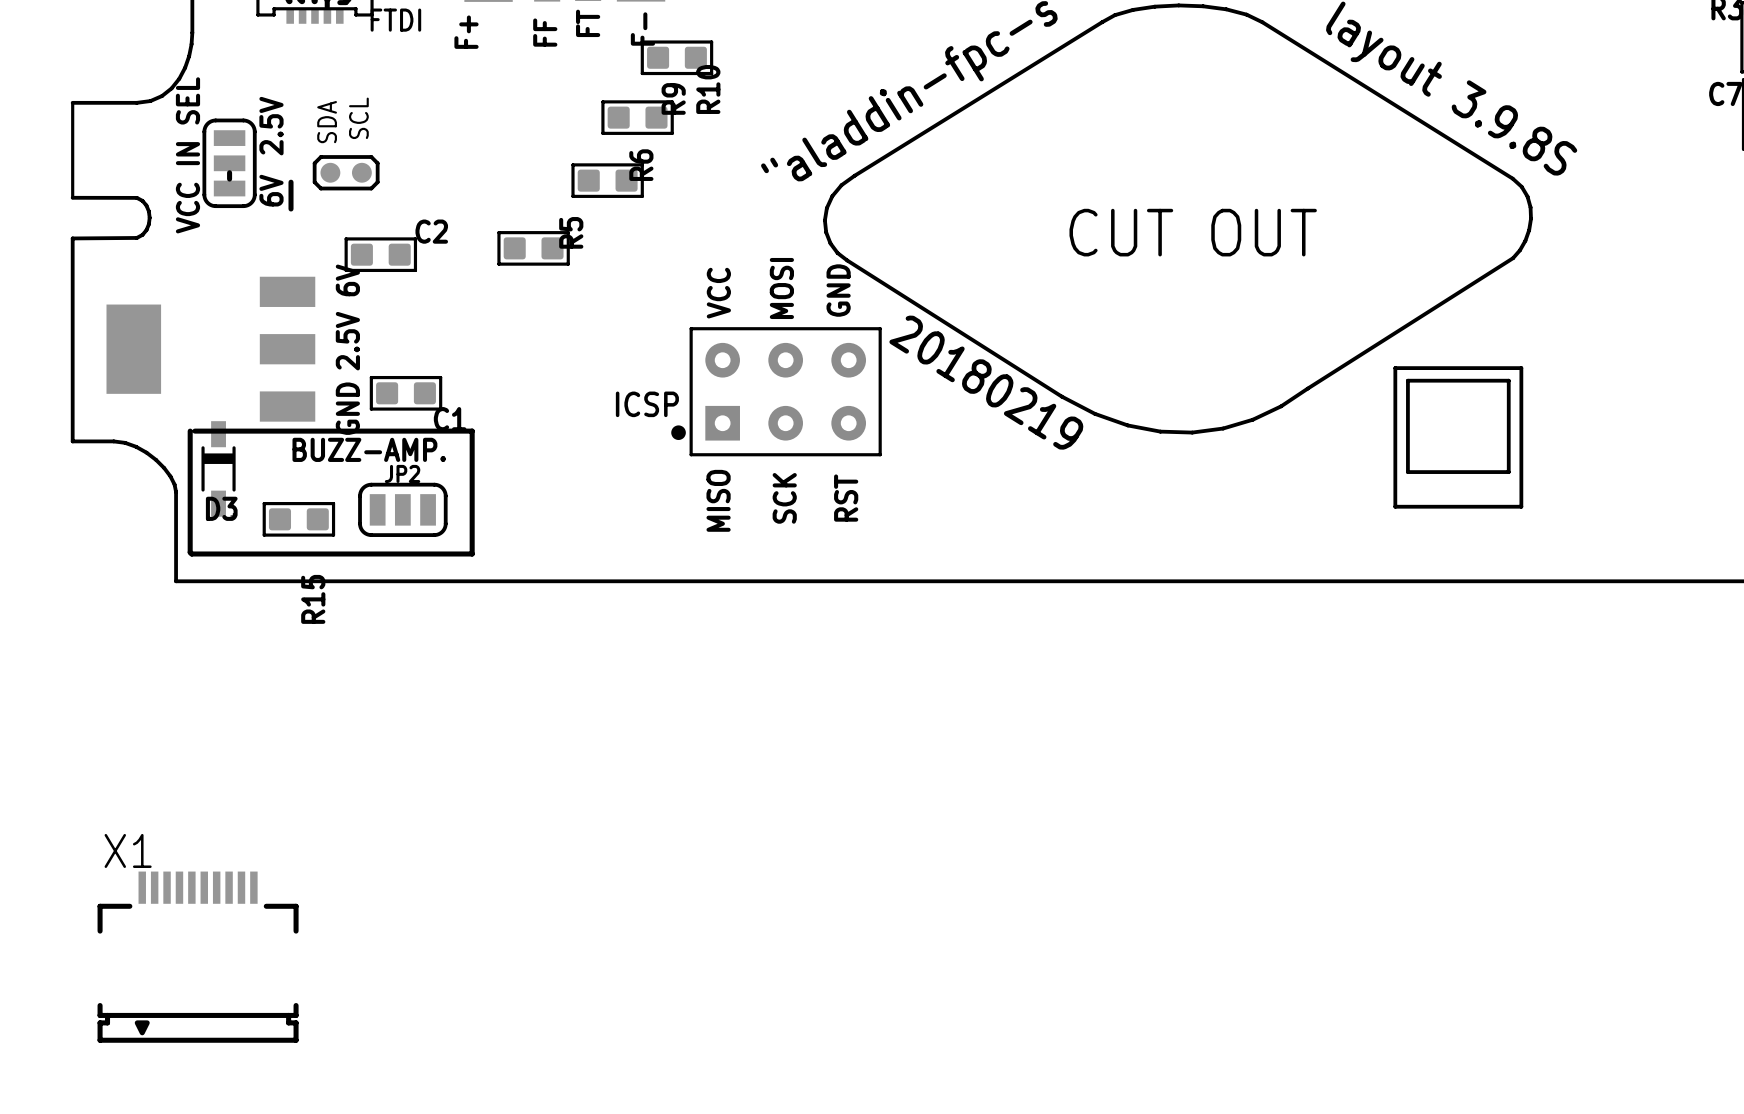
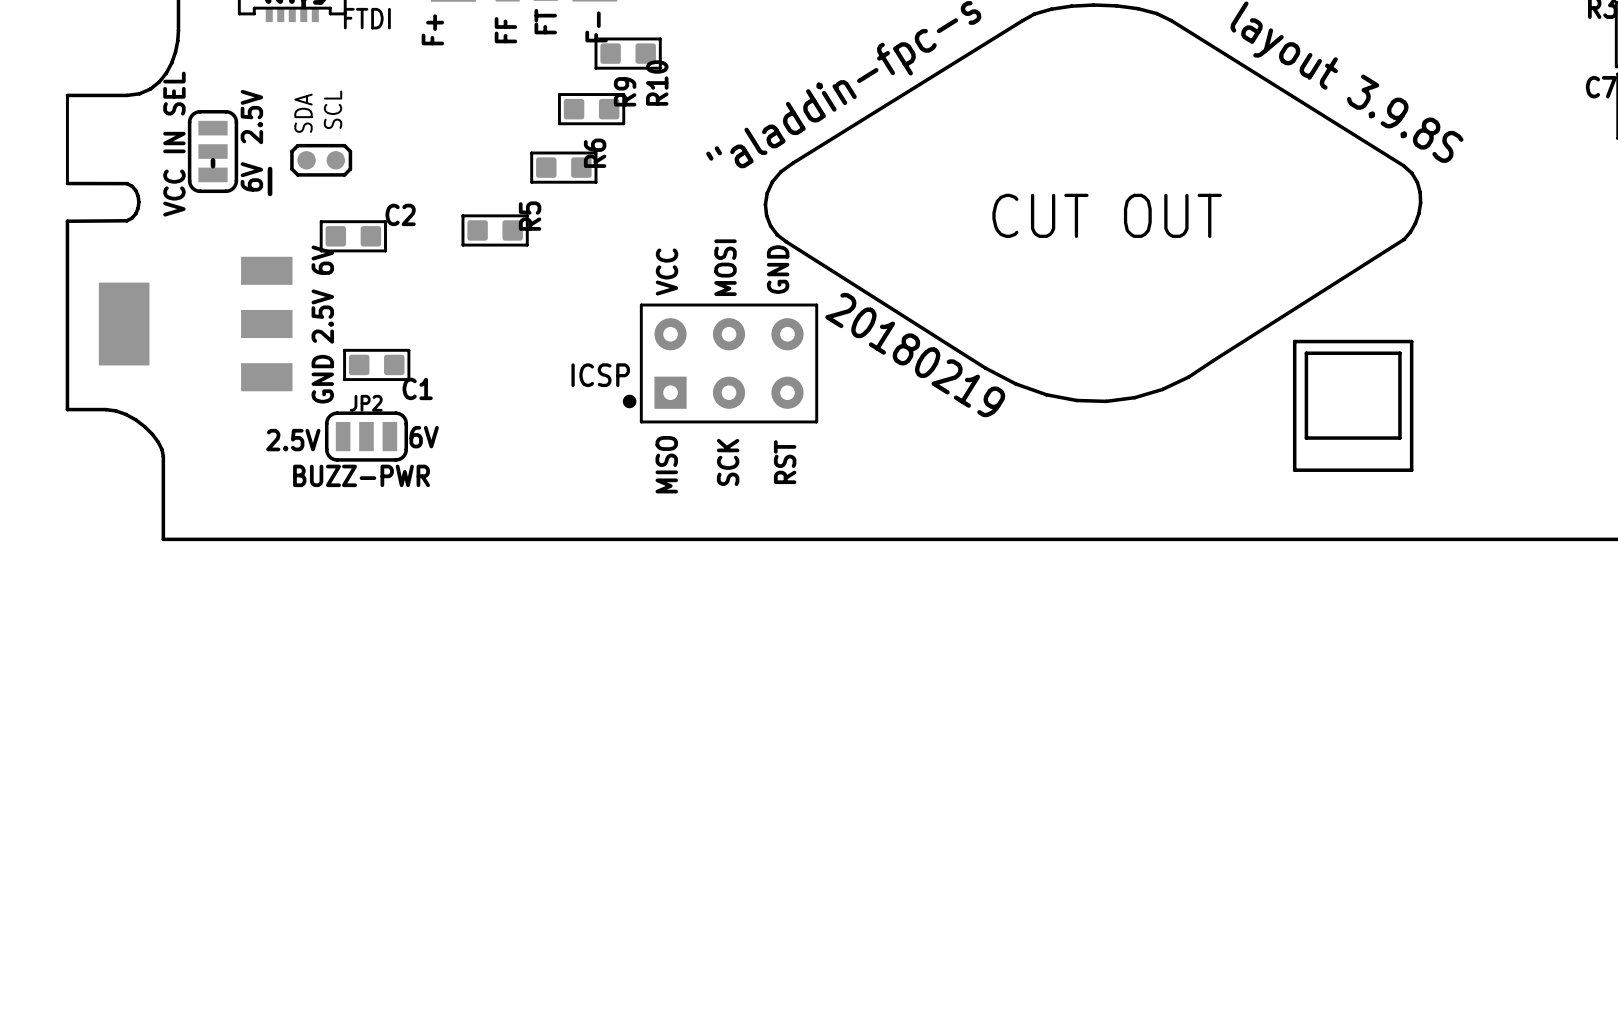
line: (190, 431) (190, 552) (191, 553) (472, 553) (472, 431) (194, 431) -> none
text: BUZZ-AMP. (369, 449) -> none
D3: (218, 470) -> none
text: none -> 6V (424, 437)
text: none -> 2.5V (293, 440)
JP2 position: (402, 509) -> (366, 436)
text: none -> BUZZ-PWR (361, 475)
R15: (298, 519) -> none
X1: (198, 957) -> none

